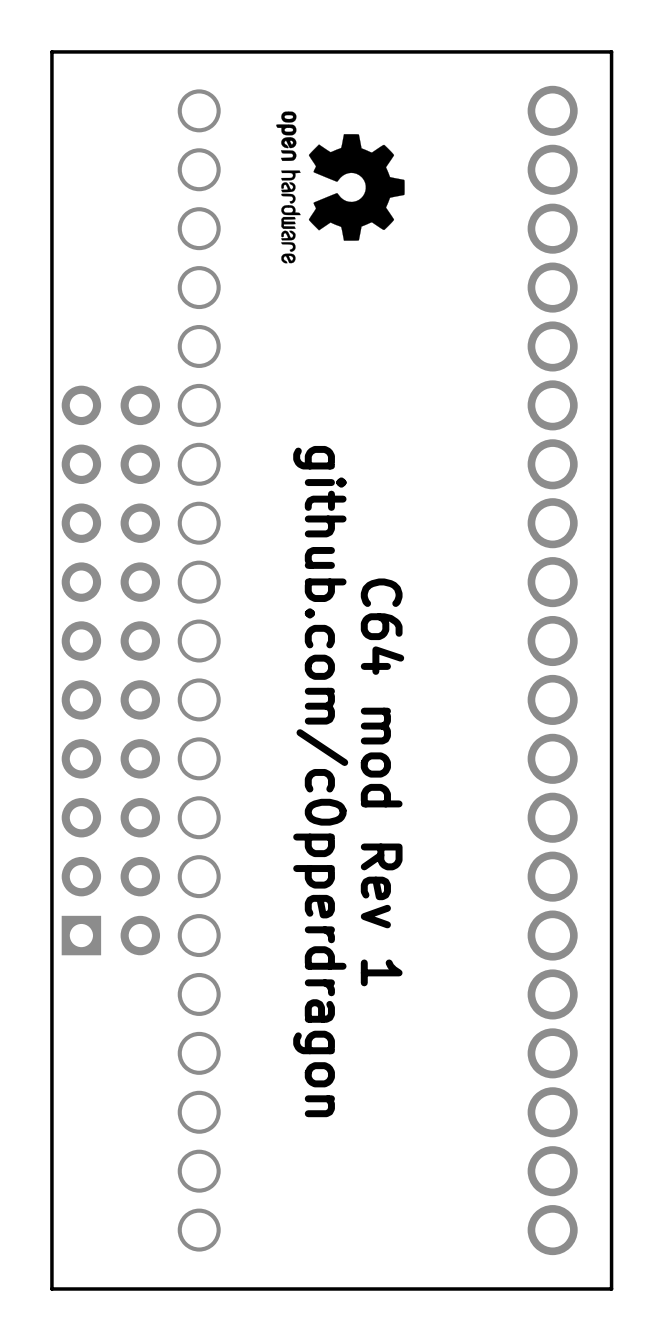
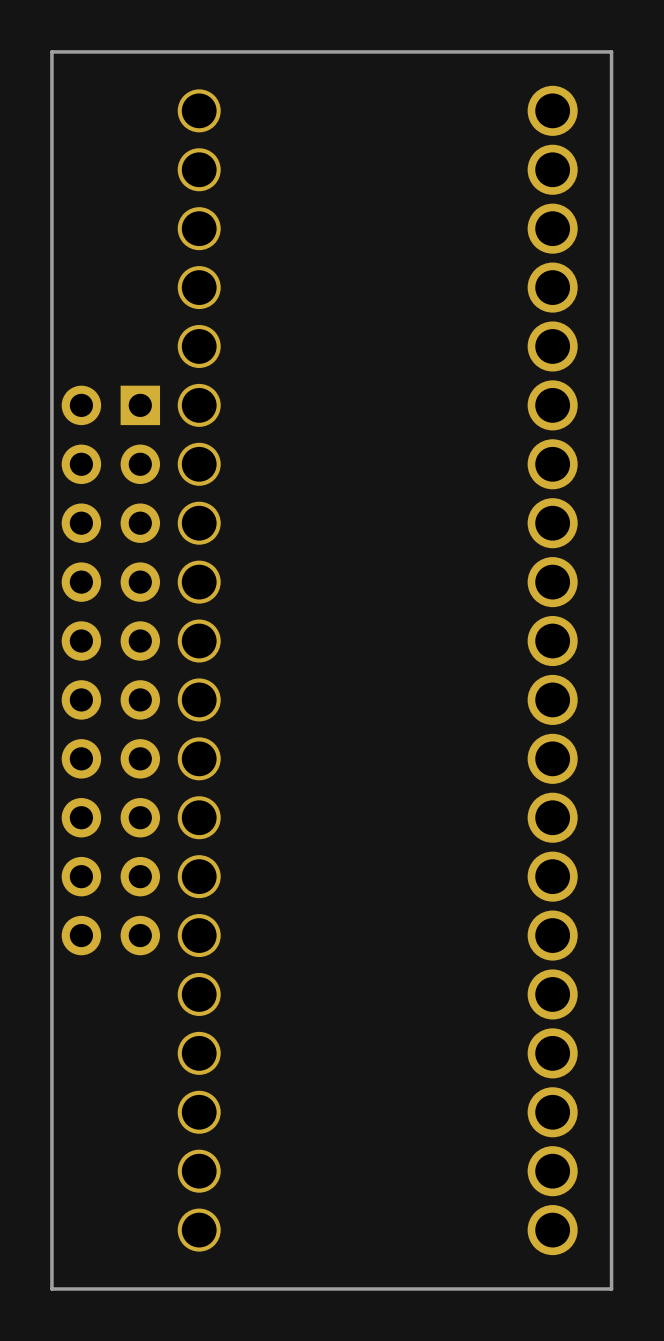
drawing: [276, 111, 405, 264] -> none
part rotation: 0° (110, 670) -> 180° (110, 670)
text: github.com/c0pperdragon (320, 781) -> none
text: C64 mod Rev 1 (382, 782) -> none

